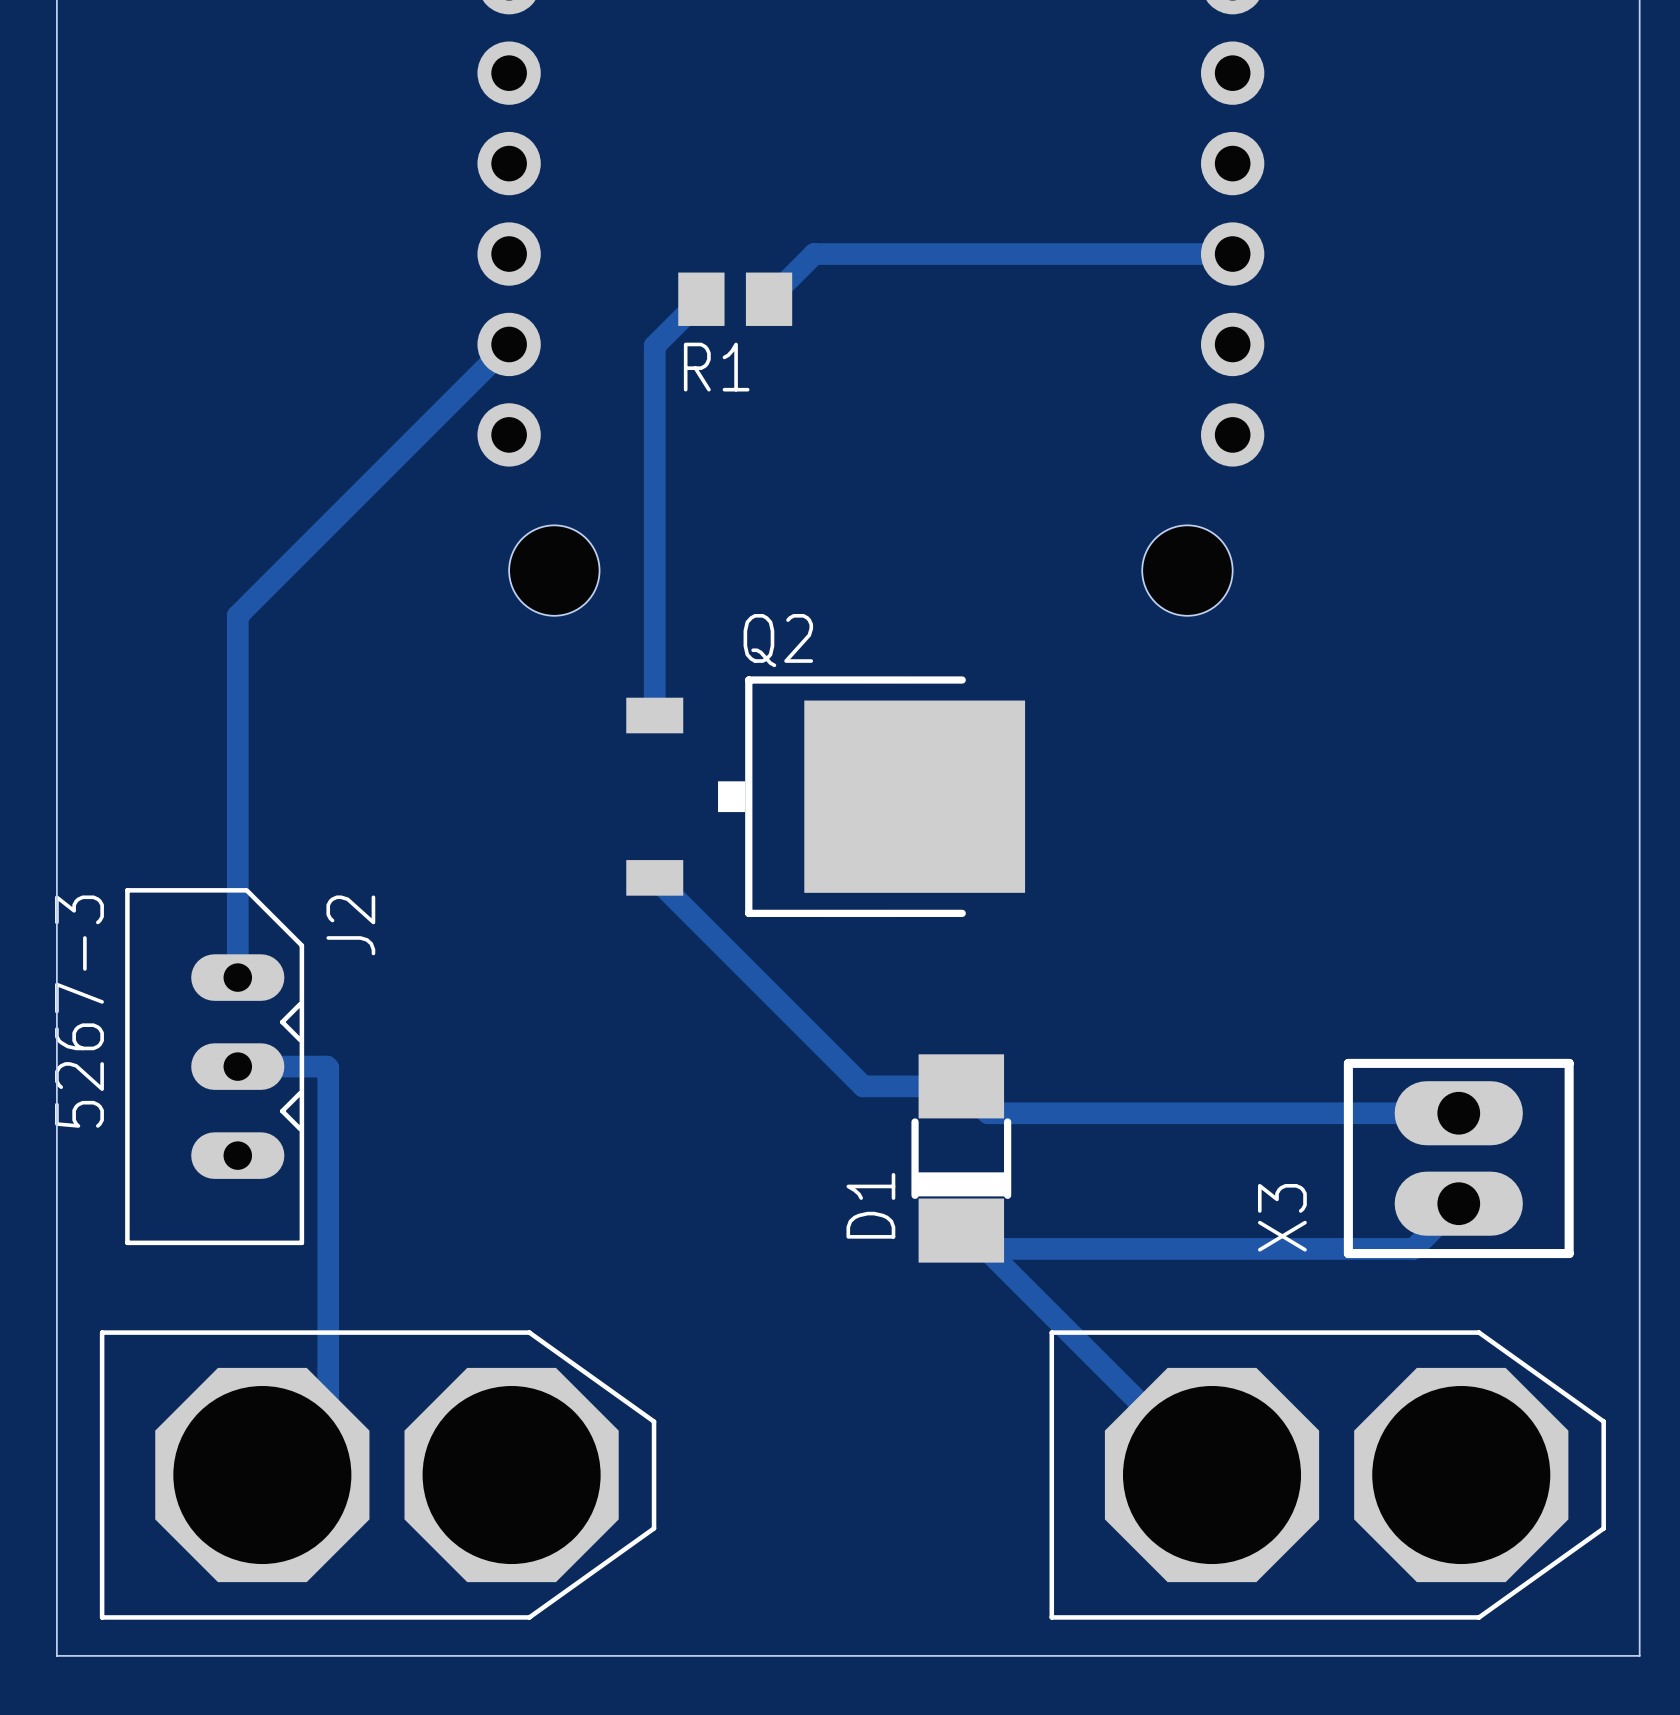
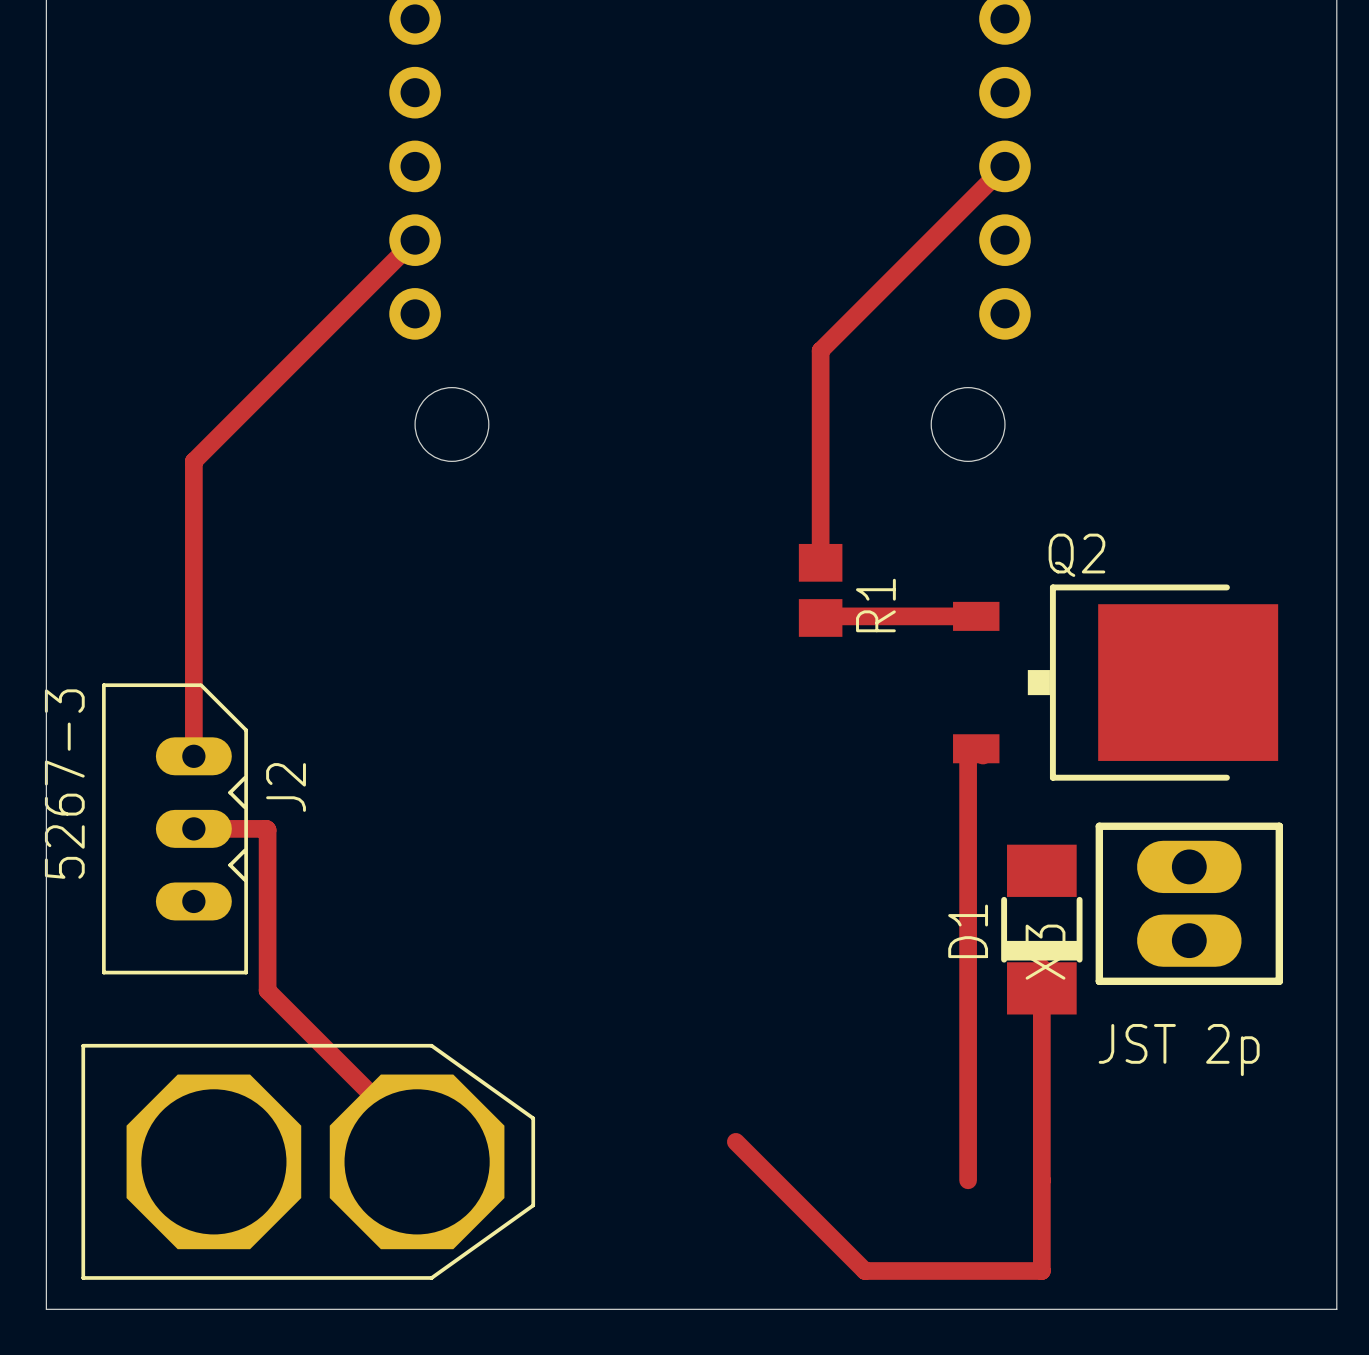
track: (1232, 254) (814, 254) (769, 299) -> (1004, 166) (820, 350) (820, 562)
track: (701, 299) (654, 345) (654, 715) -> none
R1 rotation: 0° (735, 299) -> 90° clockwise (820, 590)
R1 position: (735, 299) -> (820, 590)
R1 name position: R1 (716, 367) -> R1 (875, 605)
Q2 position: (825, 796) -> (1115, 682)
track: none -> (976, 616) (822, 616) (820, 617)
track: (654, 877) (863, 1086) (961, 1086) (988, 1113) (1458, 1113) -> none
J2 name position: J2 (350, 925) -> J2 (286, 787)
track: none -> (983, 755) (976, 748) (968, 756) (968, 1180)
D1 position: (961, 1158) -> (1041, 929)
D1 name position: D1 (870, 1205) -> D1 (968, 931)
track: (1479, 1224) (1458, 1203) (1413, 1248) (979, 1248) (961, 1230) (967, 1230) (1212, 1475) (1205, 1475) -> none
track: none -> (1041, 967) (1041, 1270) (865, 1270) (735, 1141)
track: (328, 1265) (328, 1409) (262, 1475) -> (267, 990) (422, 1145)
text: none -> JST 2p (1179, 1050)
part: (1327, 1475) -> none

